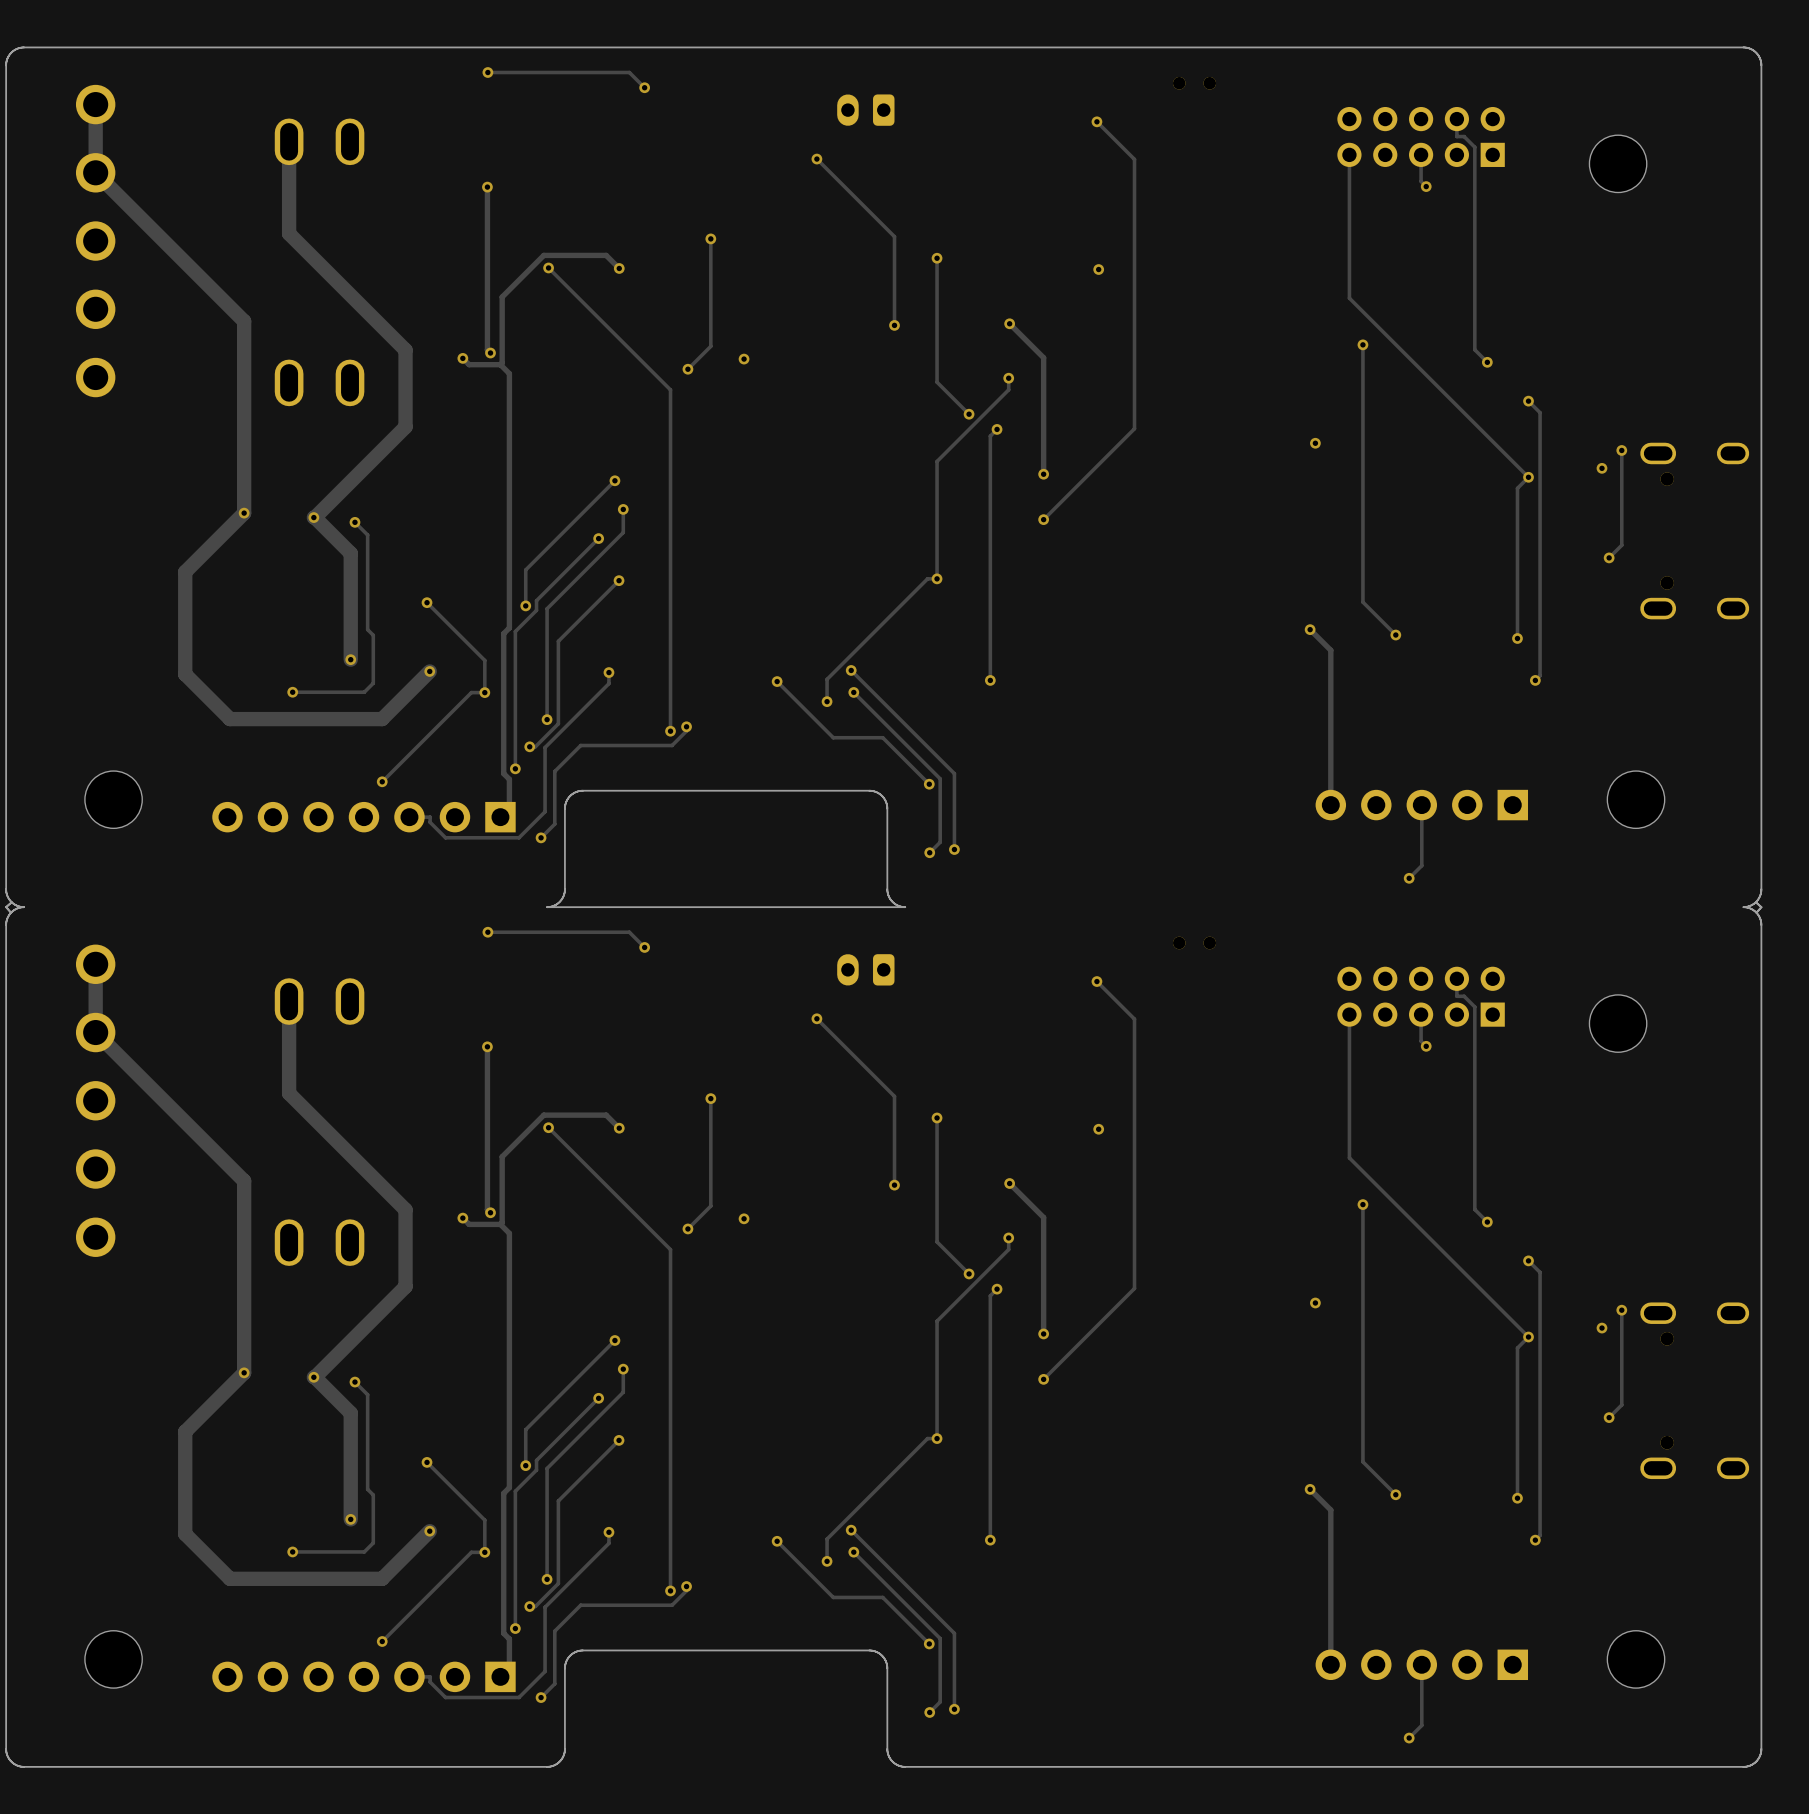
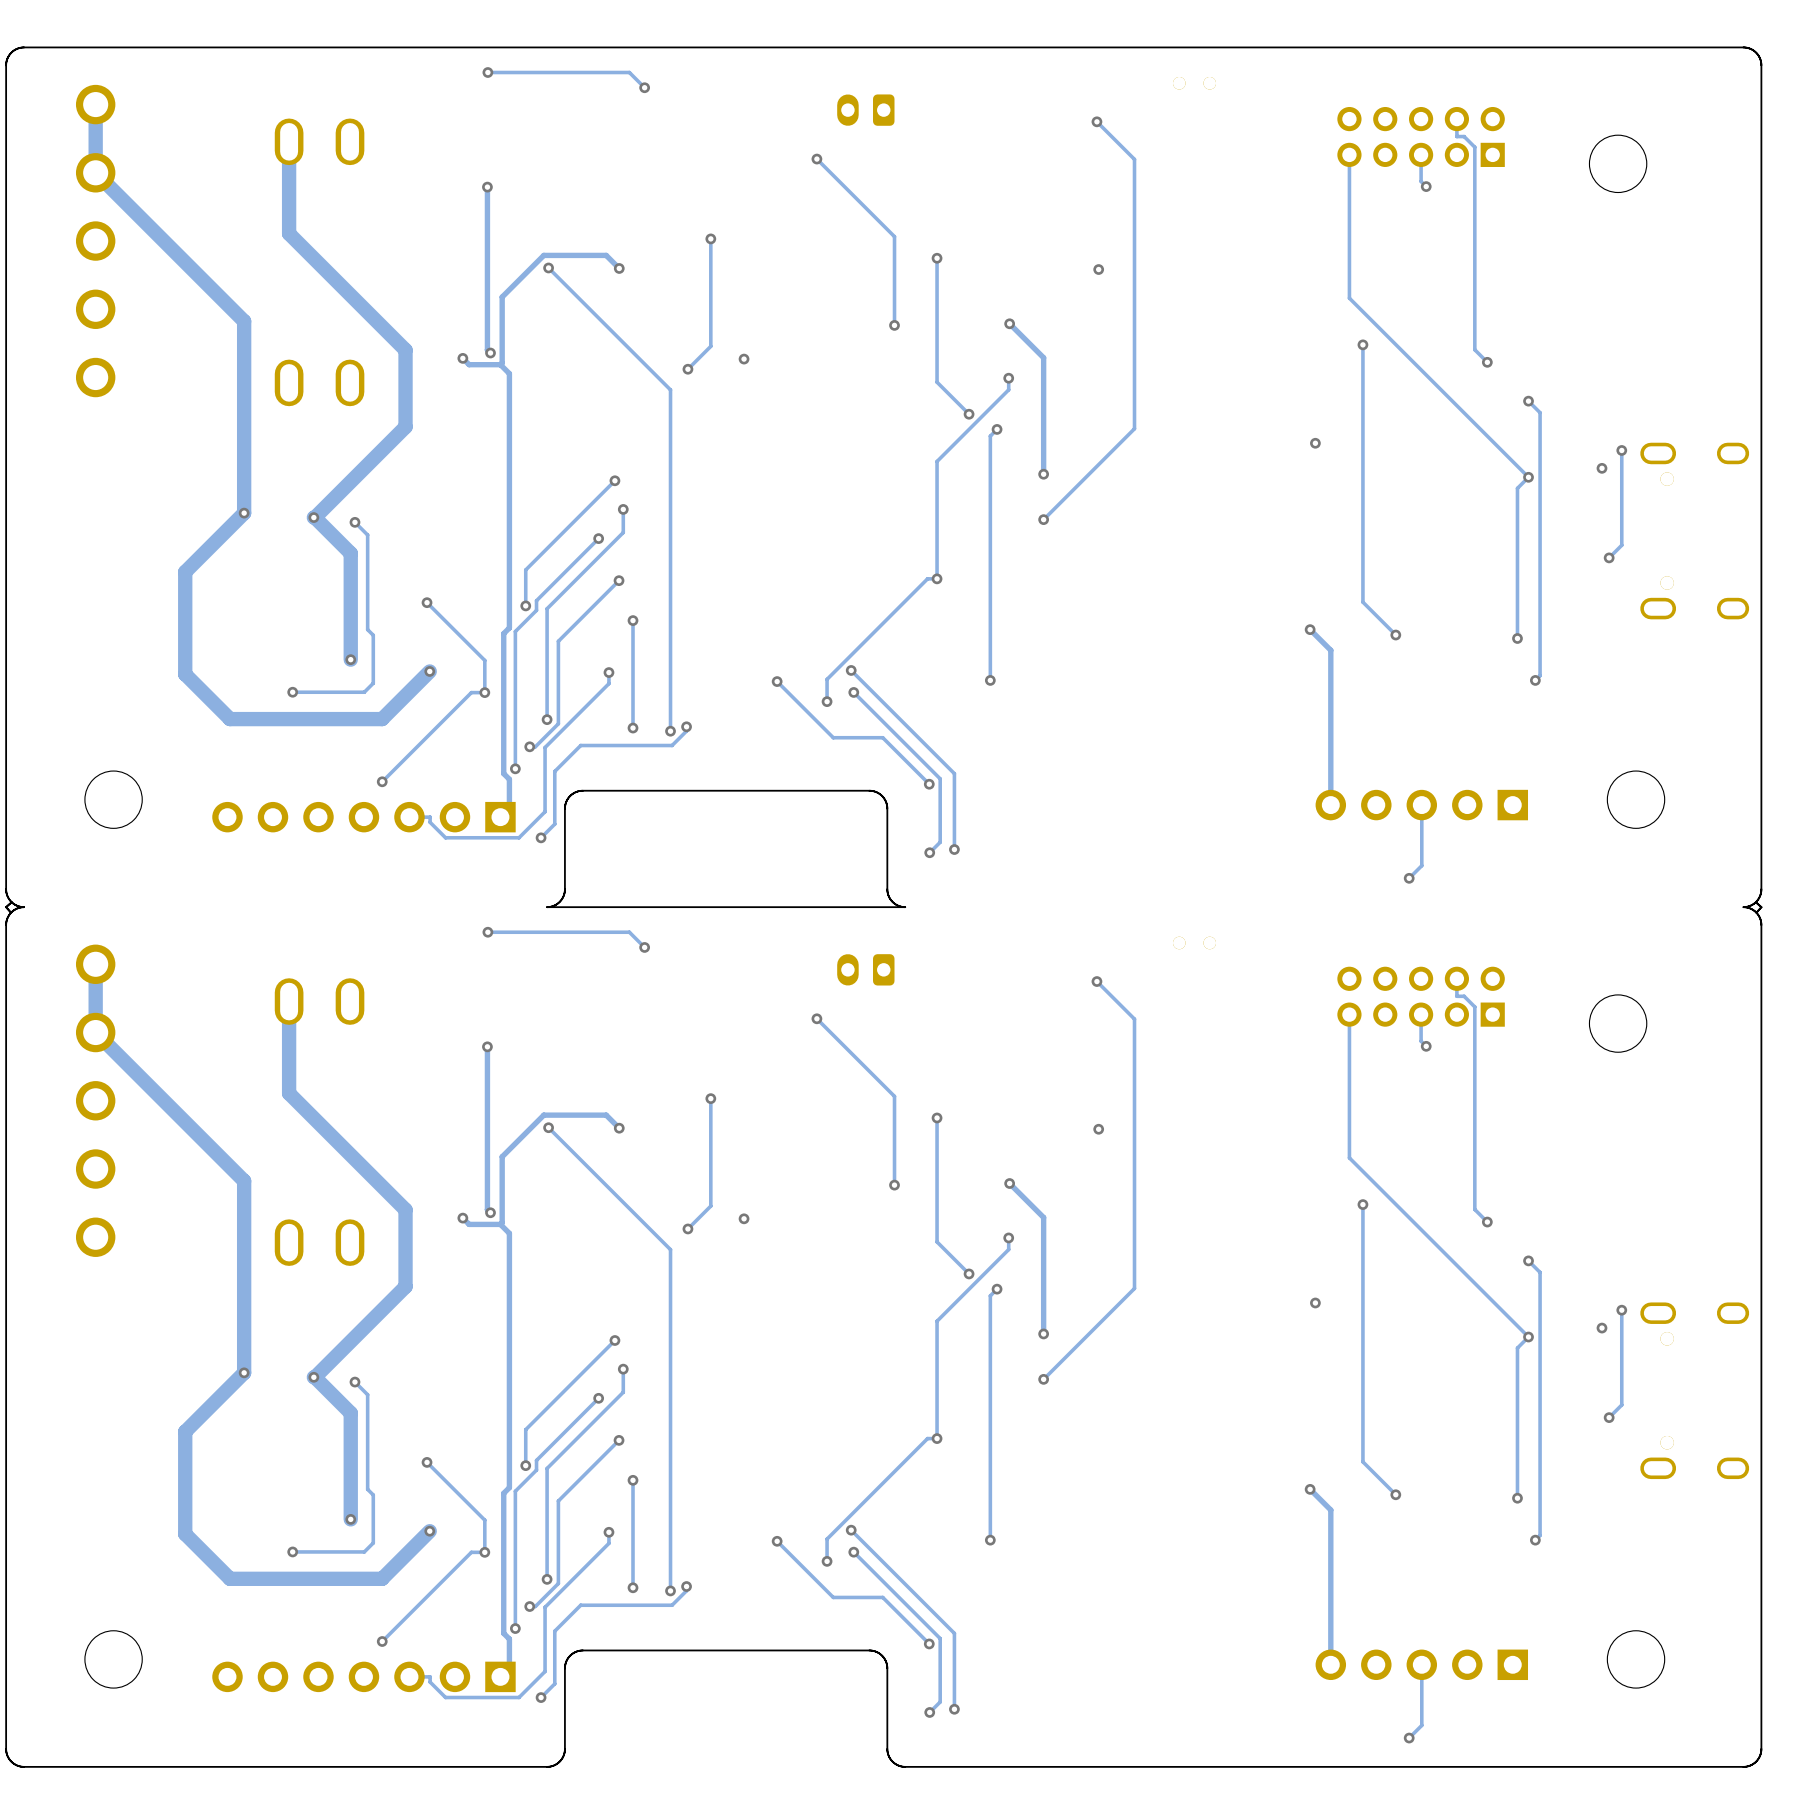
track: none -> (633, 620) (633, 728)
via: none -> (633, 620)
via: none -> (633, 728)
track: none -> (633, 1480) (633, 1587)
via: none -> (633, 1480)
via: none -> (633, 1587)

